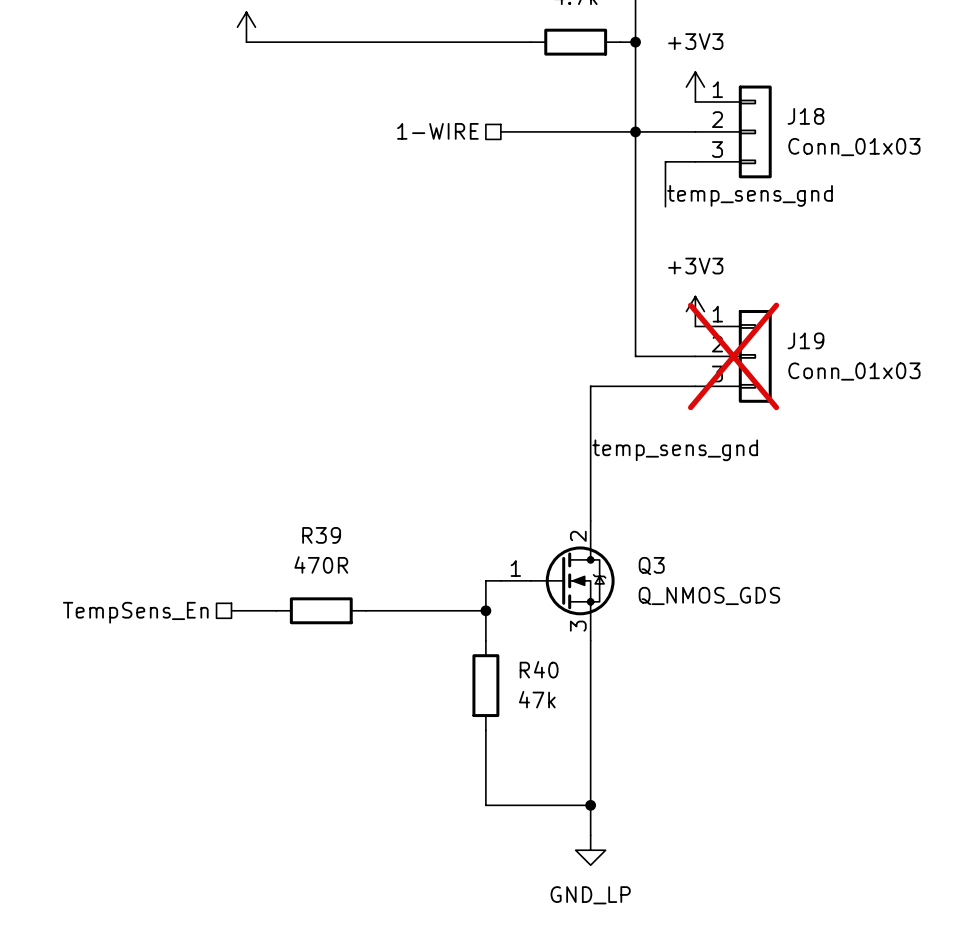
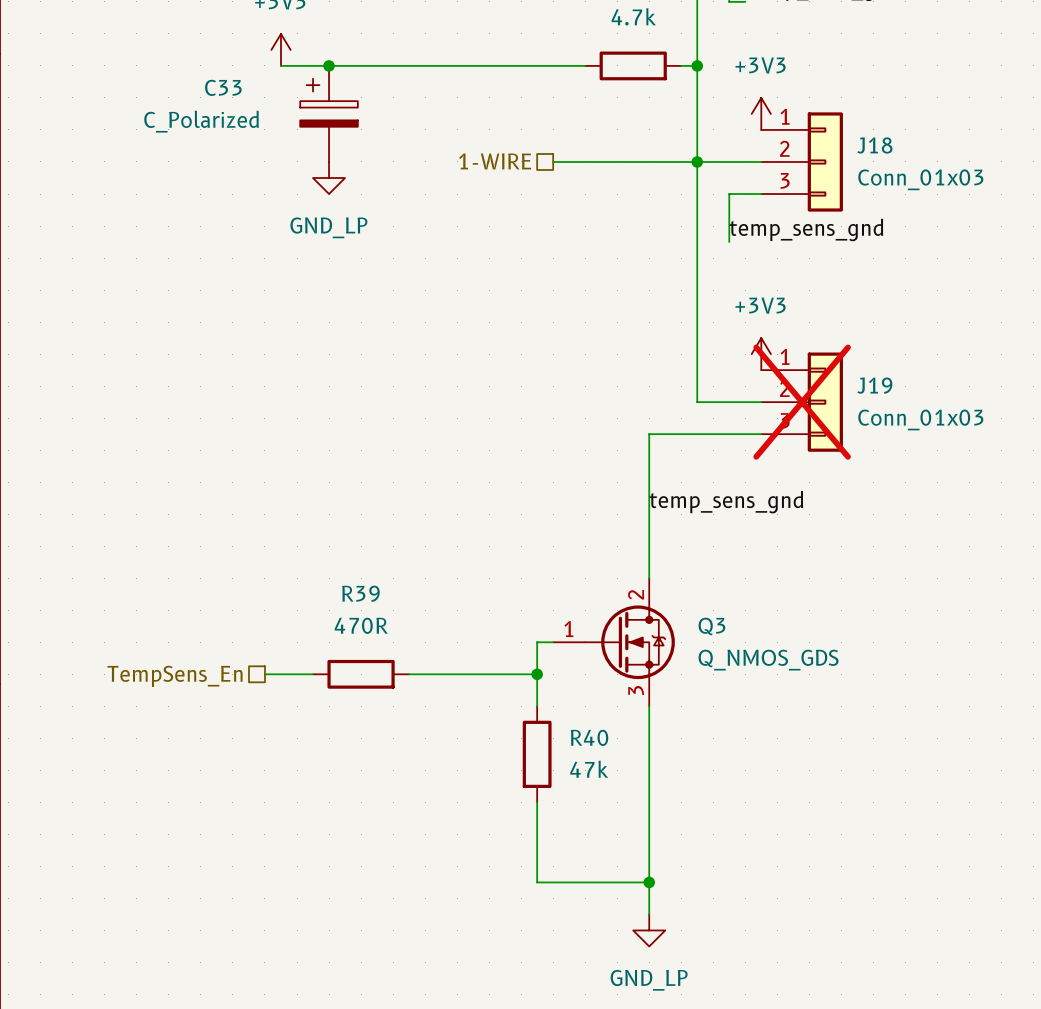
junction: none -> (329, 65)
C33: none -> C_Polarized (329, 113)
power symbol: none -> GND_LP (329, 178)

